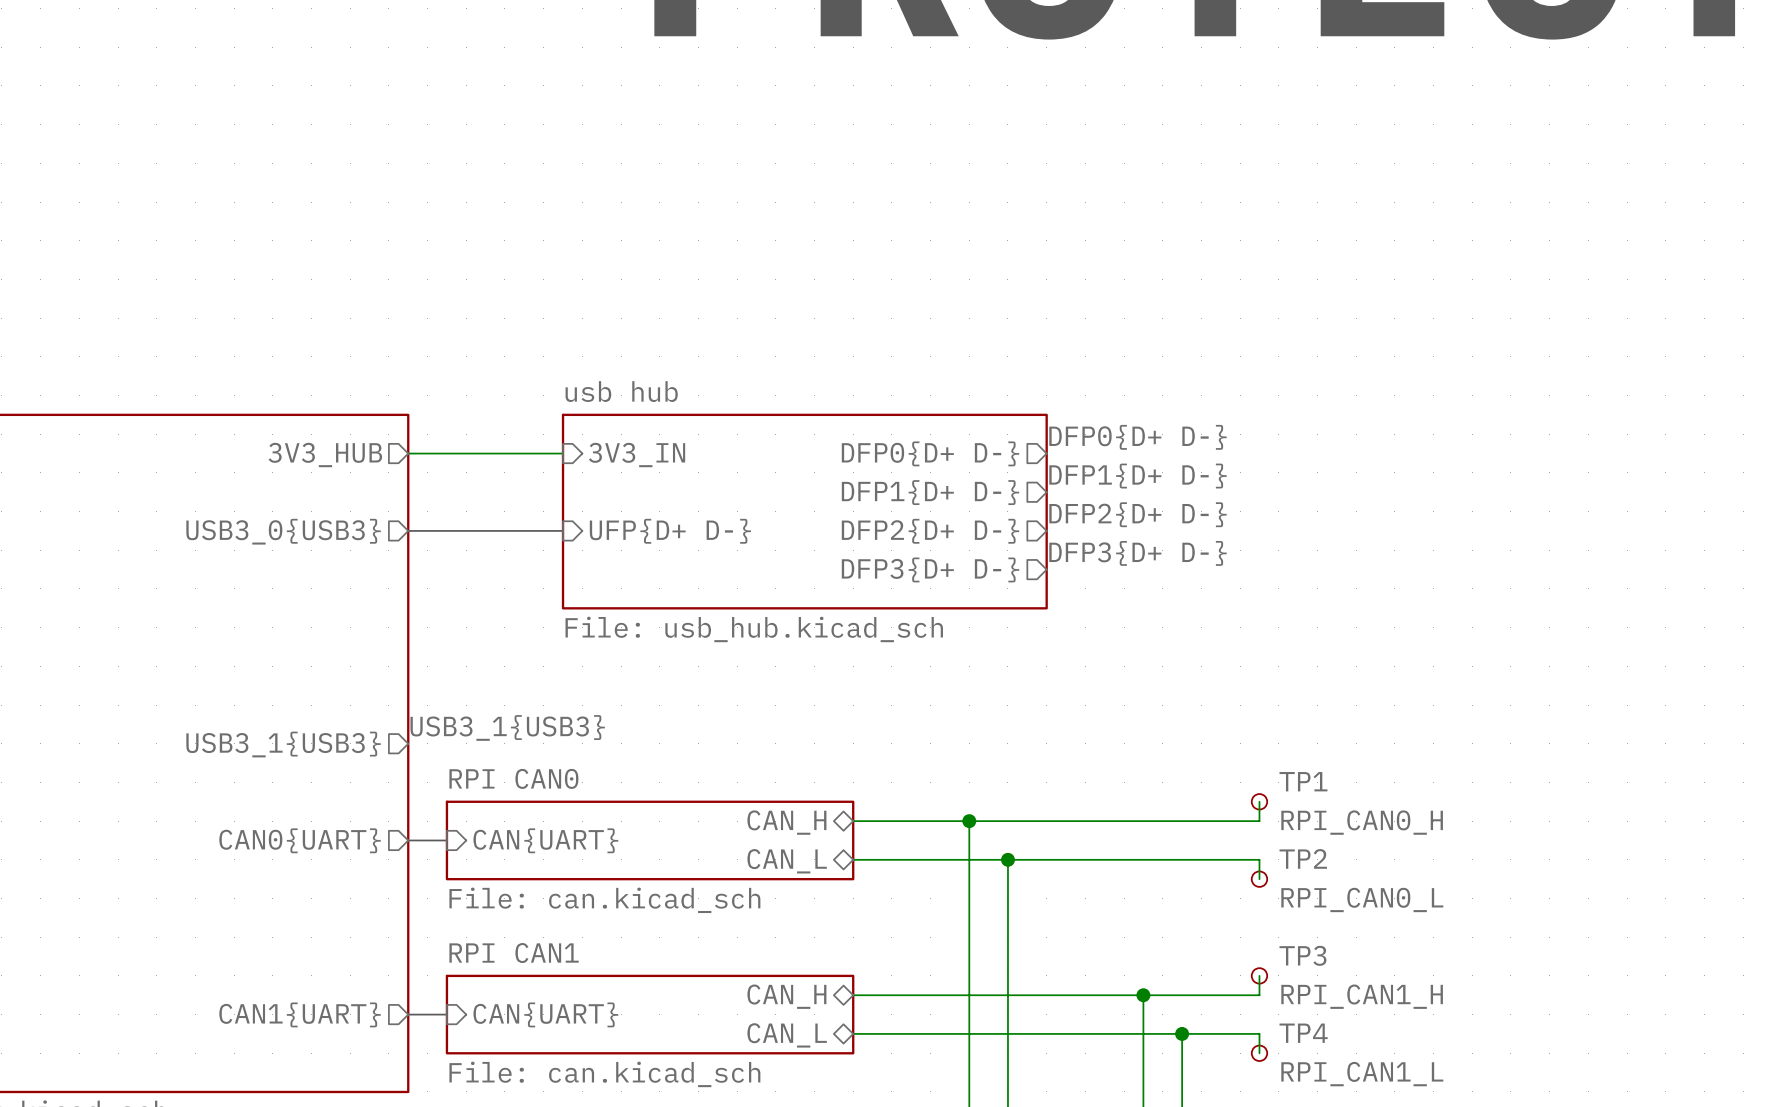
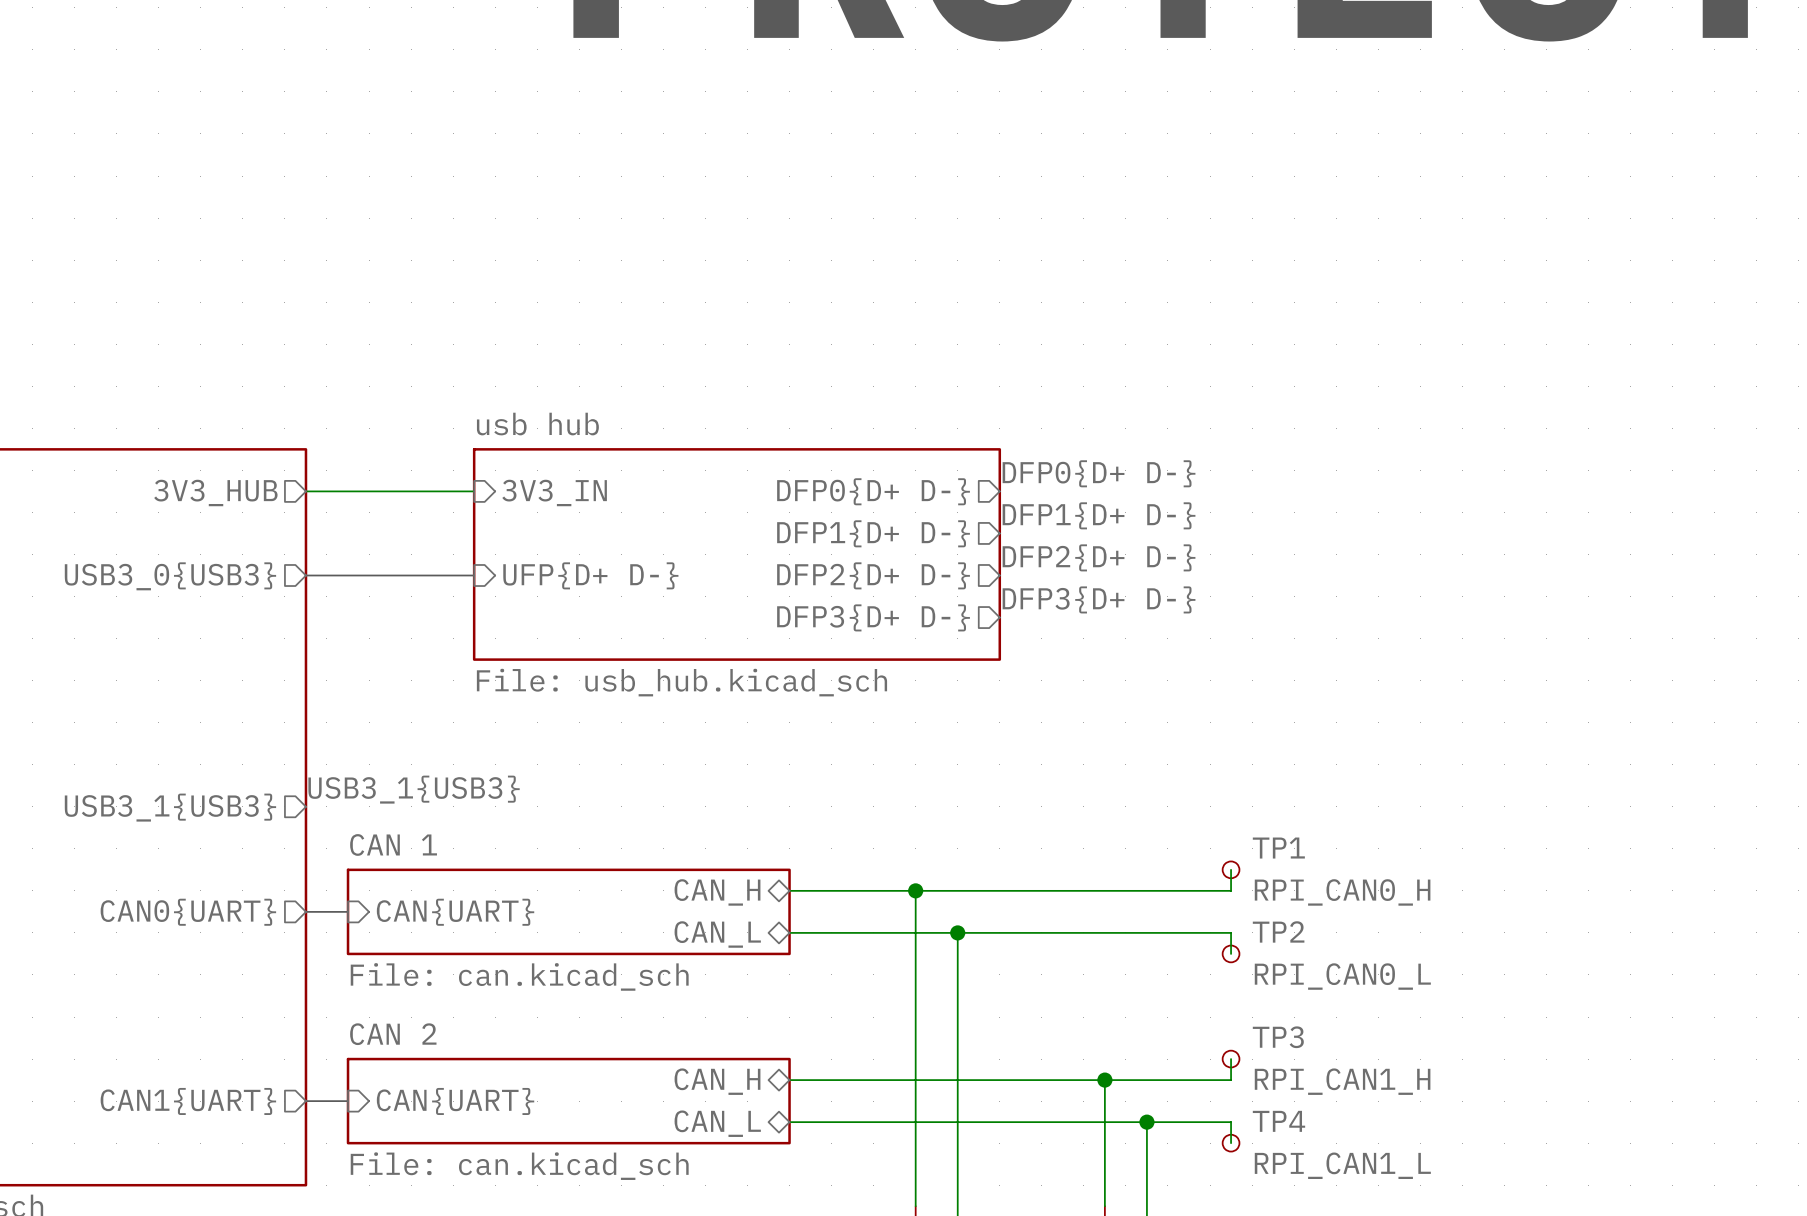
sheet RPI CAN0 name: RPI CAN0 (513, 778) -> CAN 1 (393, 844)
sheet RPI CAN1 name: RPI CAN1 (514, 953) -> CAN 2 (393, 1034)

